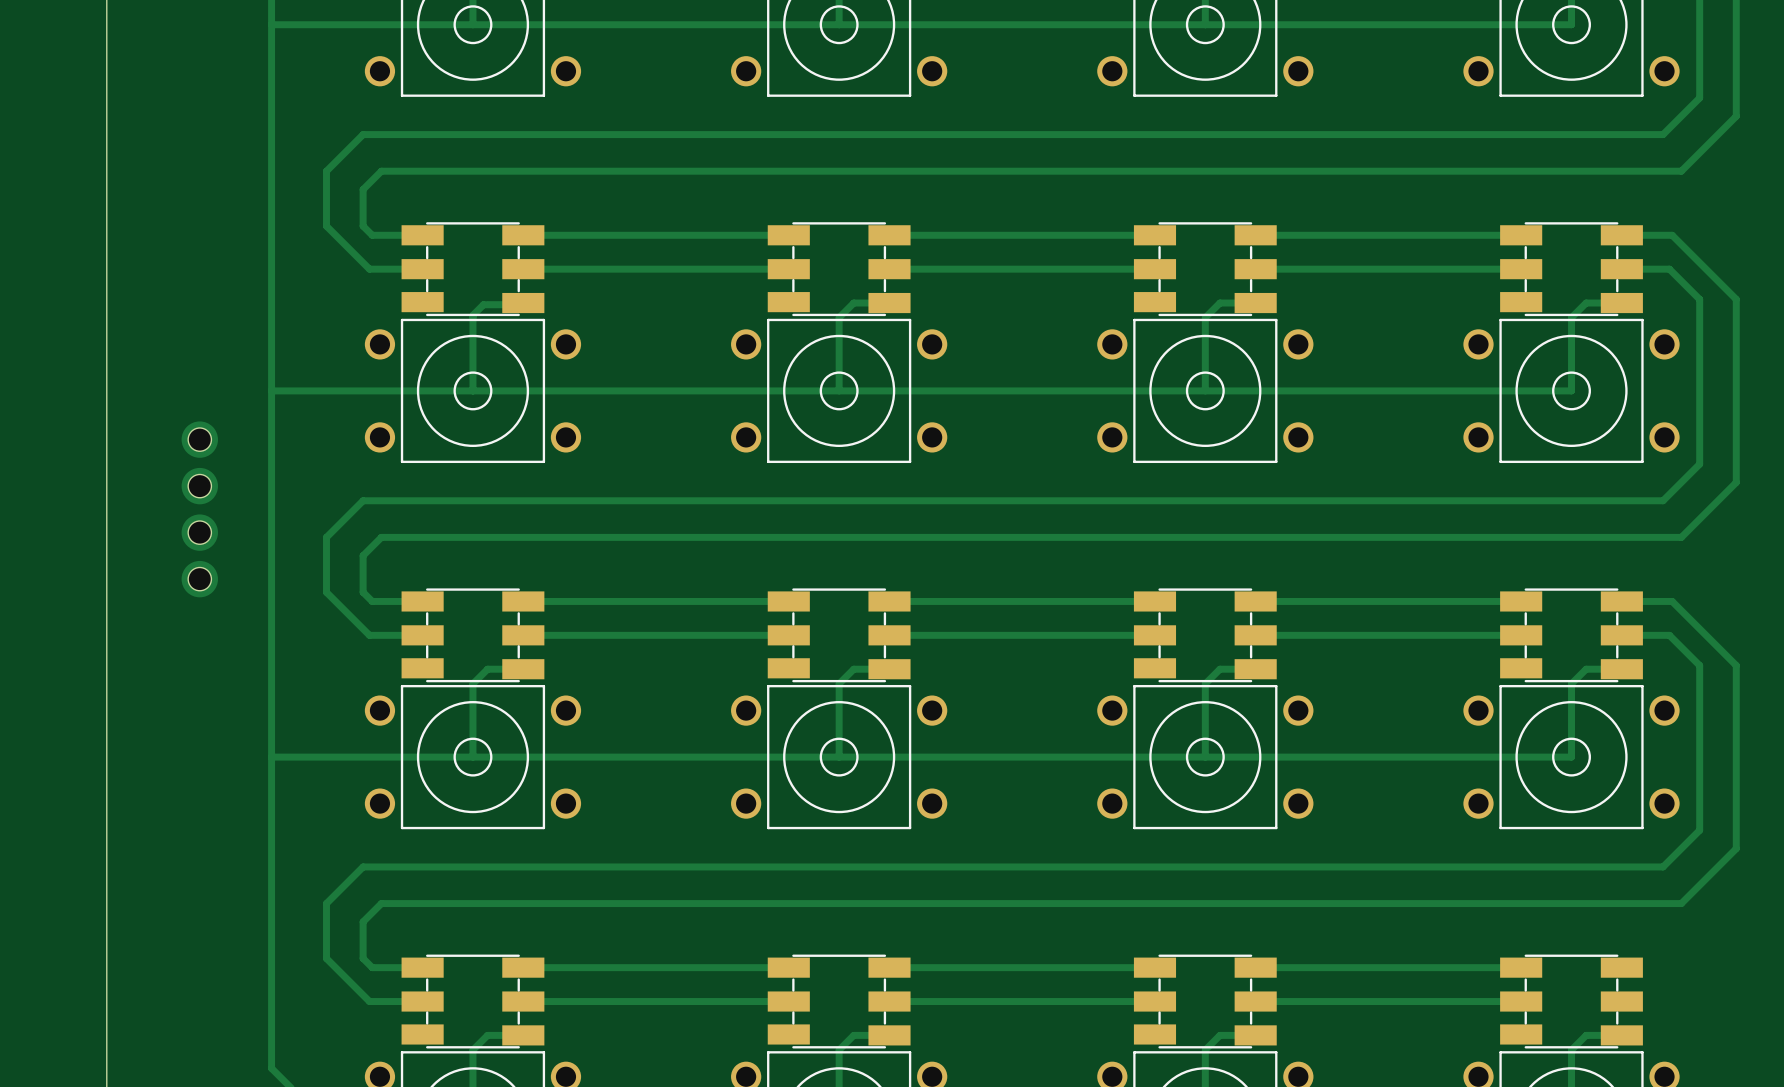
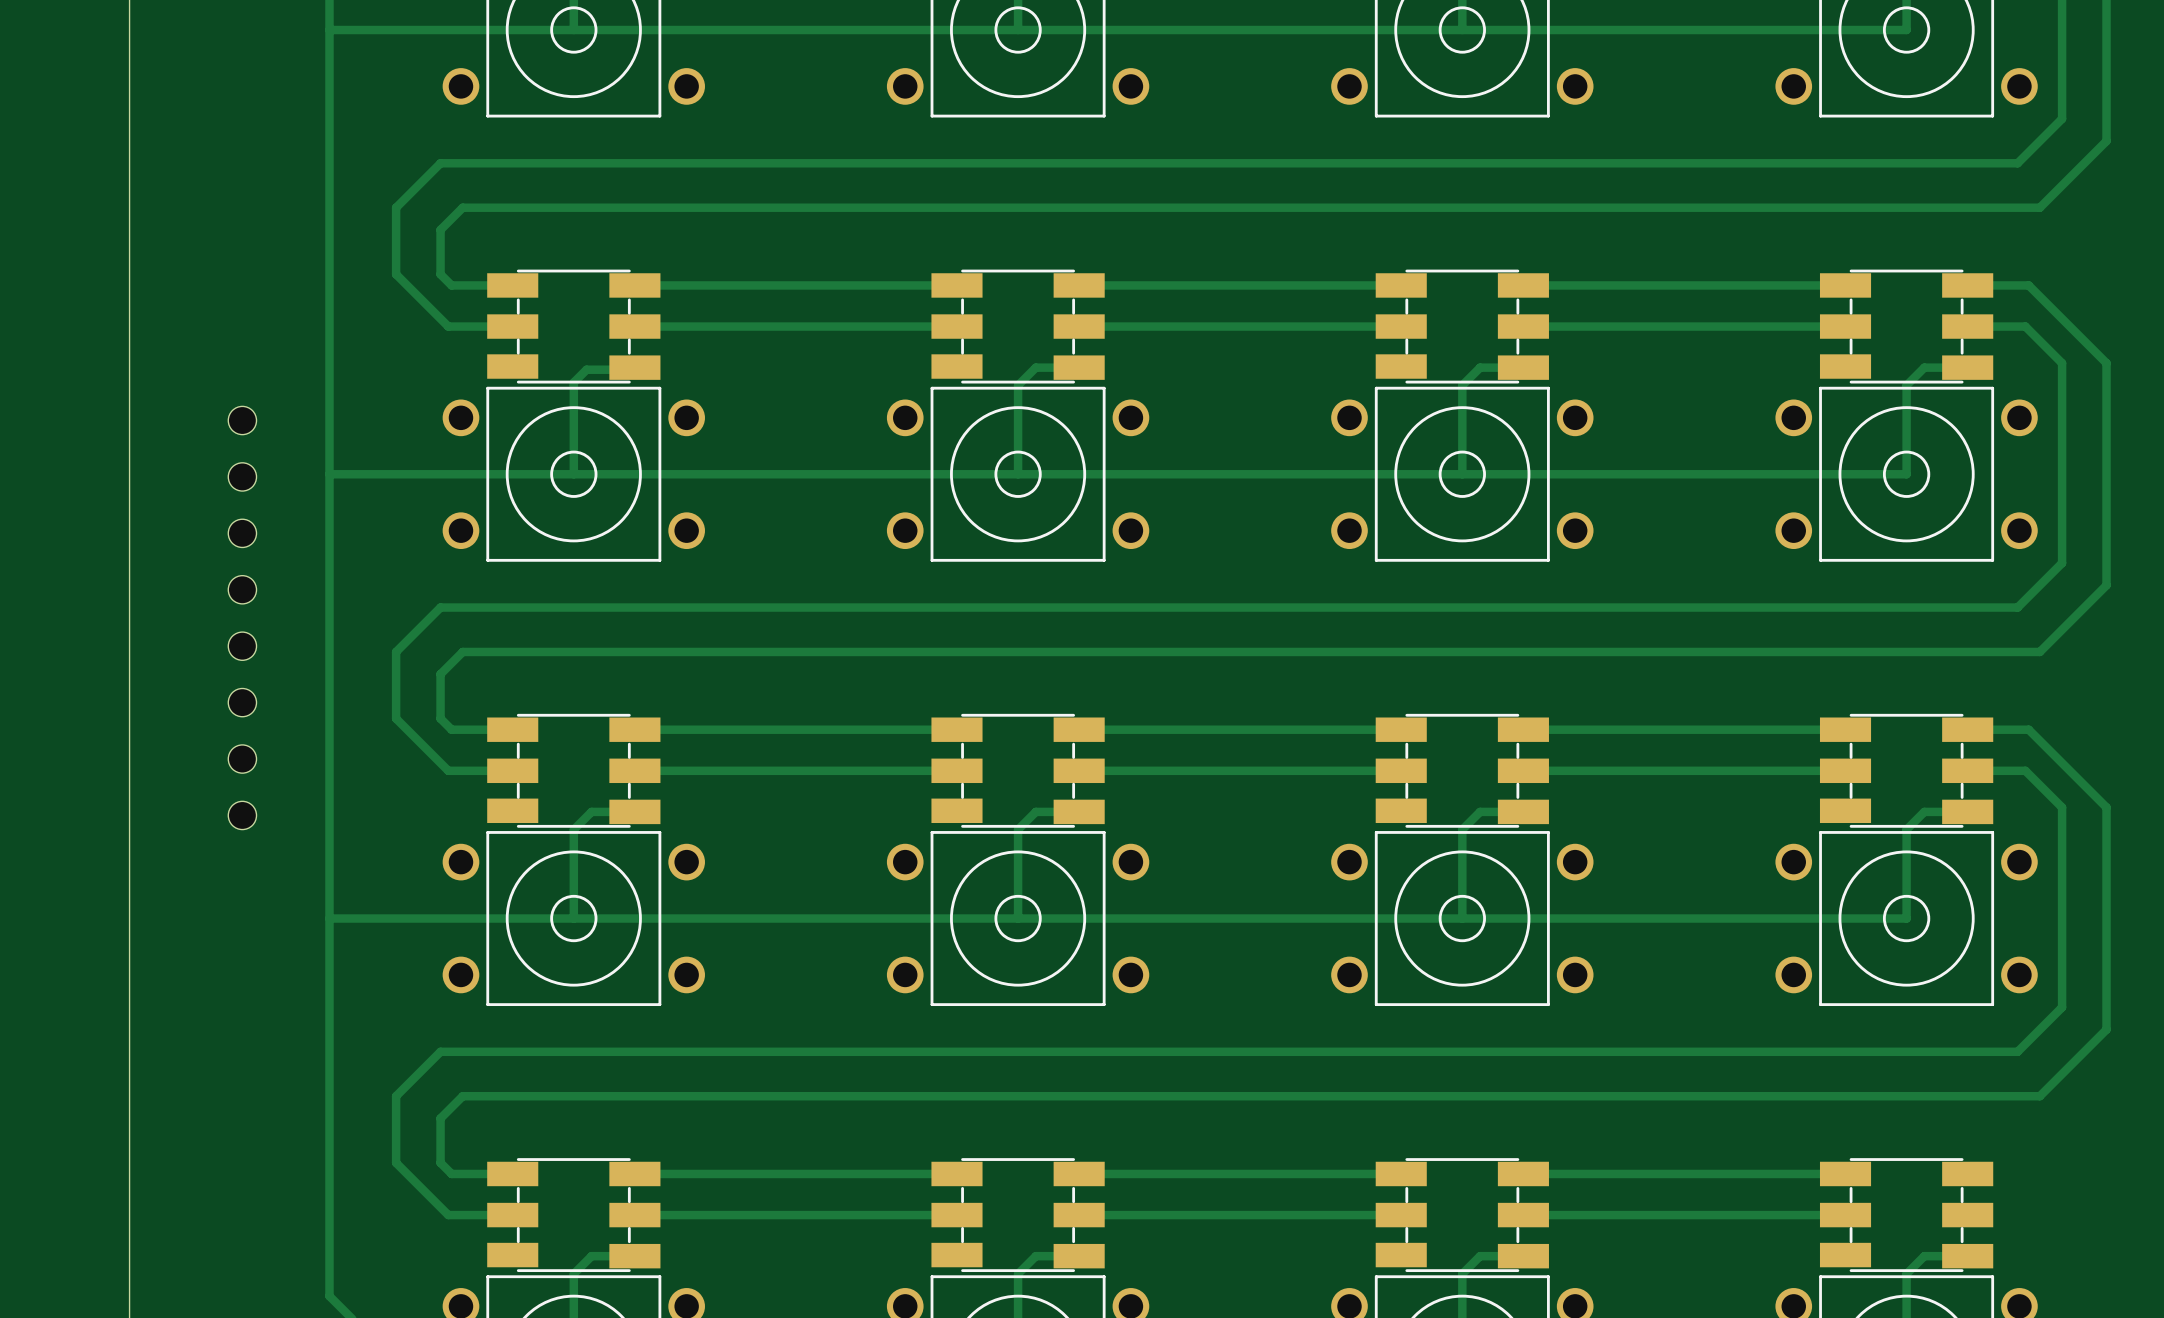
hole: none -> (242, 420)
hole: none -> (242, 476)
drawing: [181, 421, 218, 598] -> none
hole: none -> (242, 759)
hole: none -> (242, 815)

